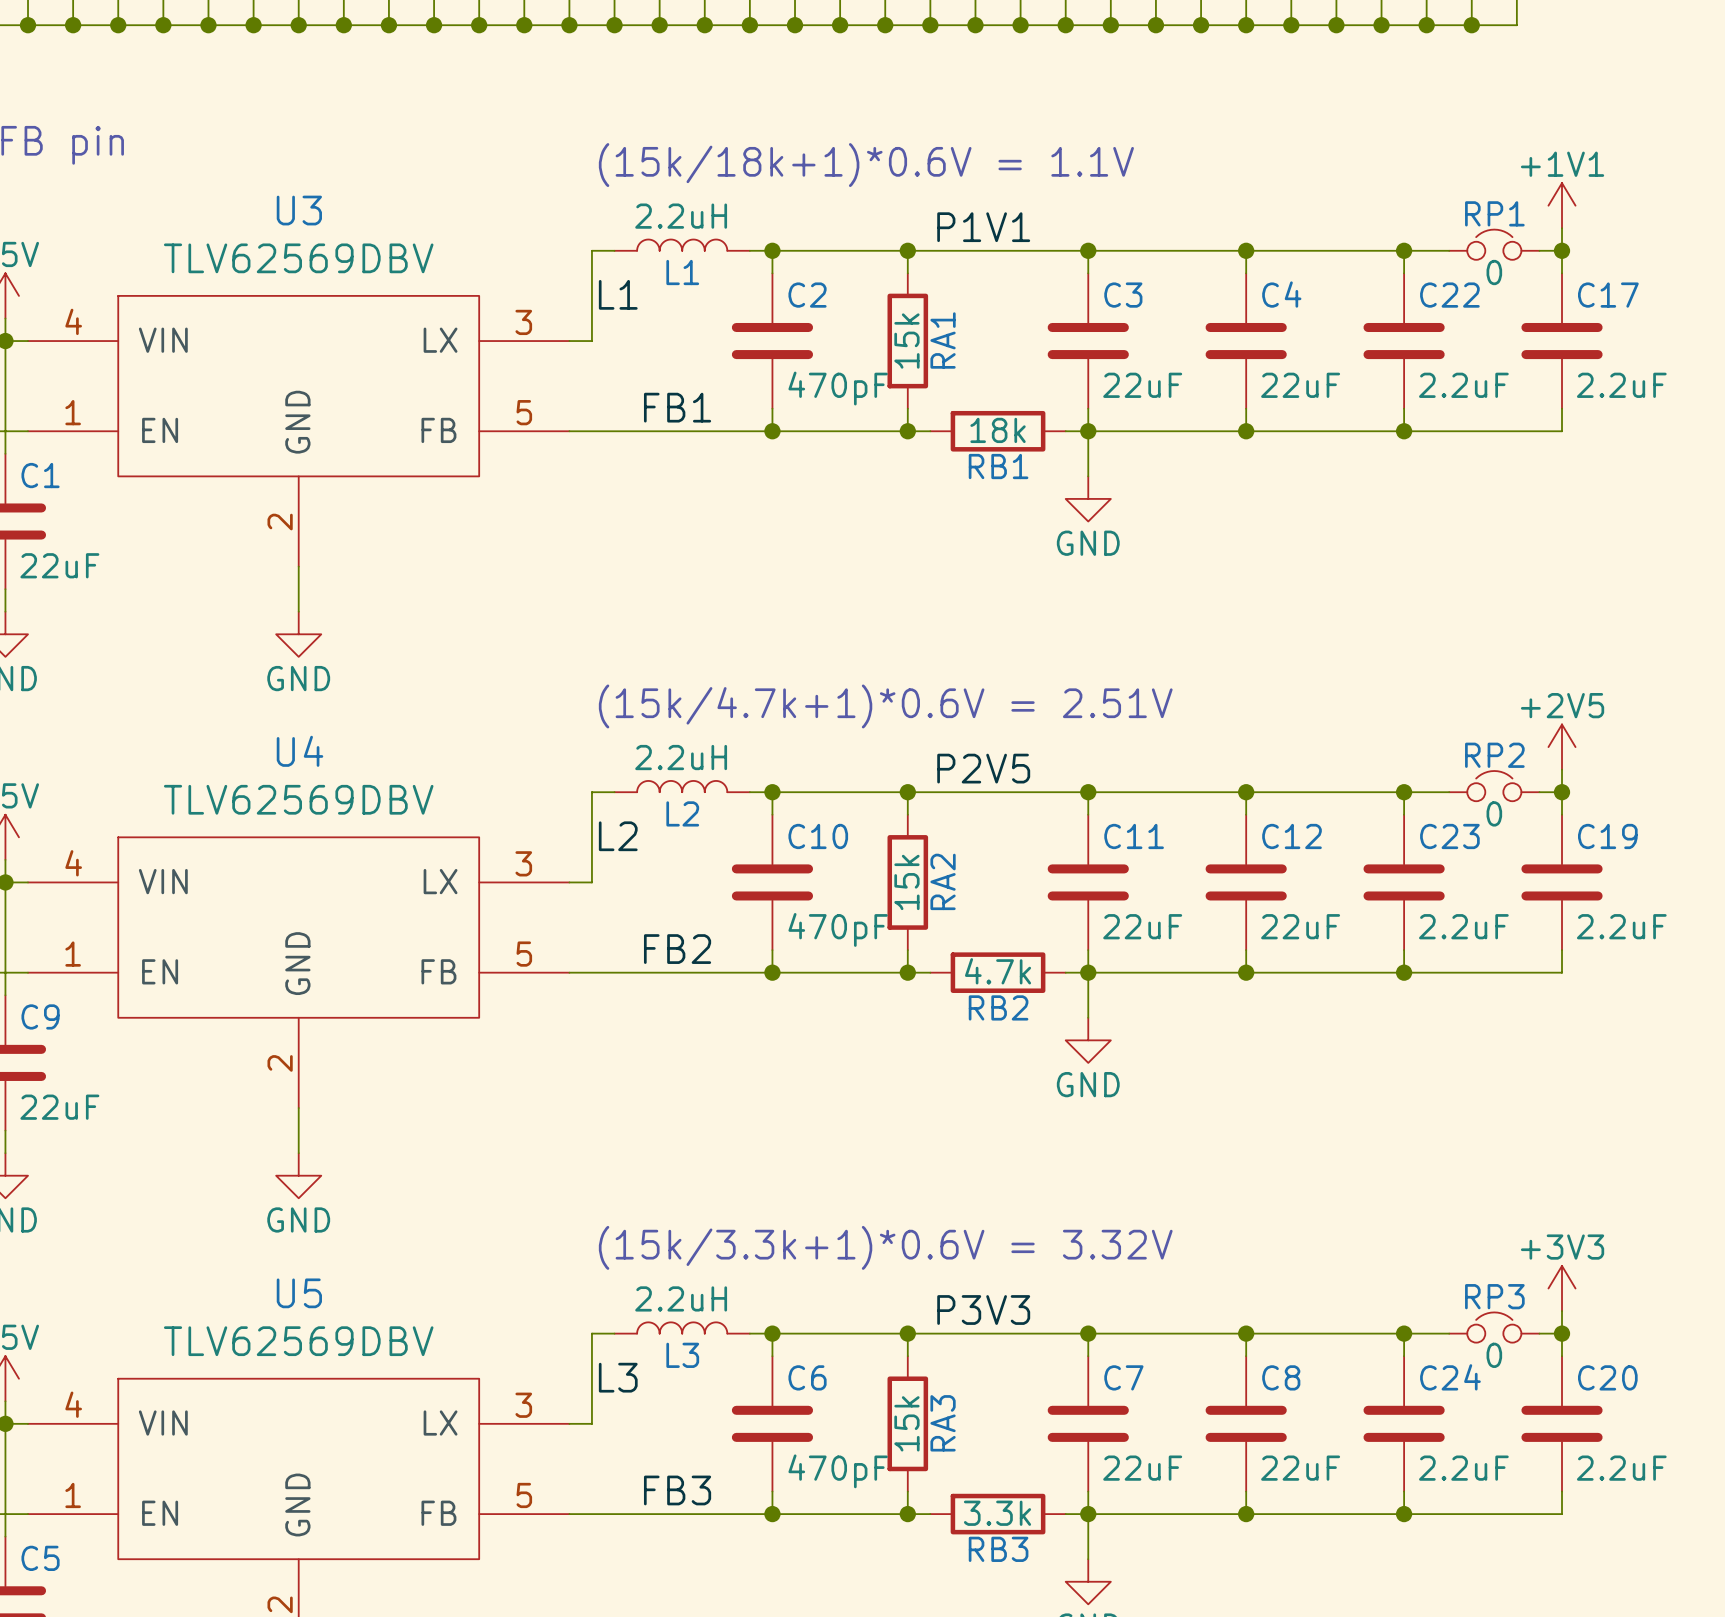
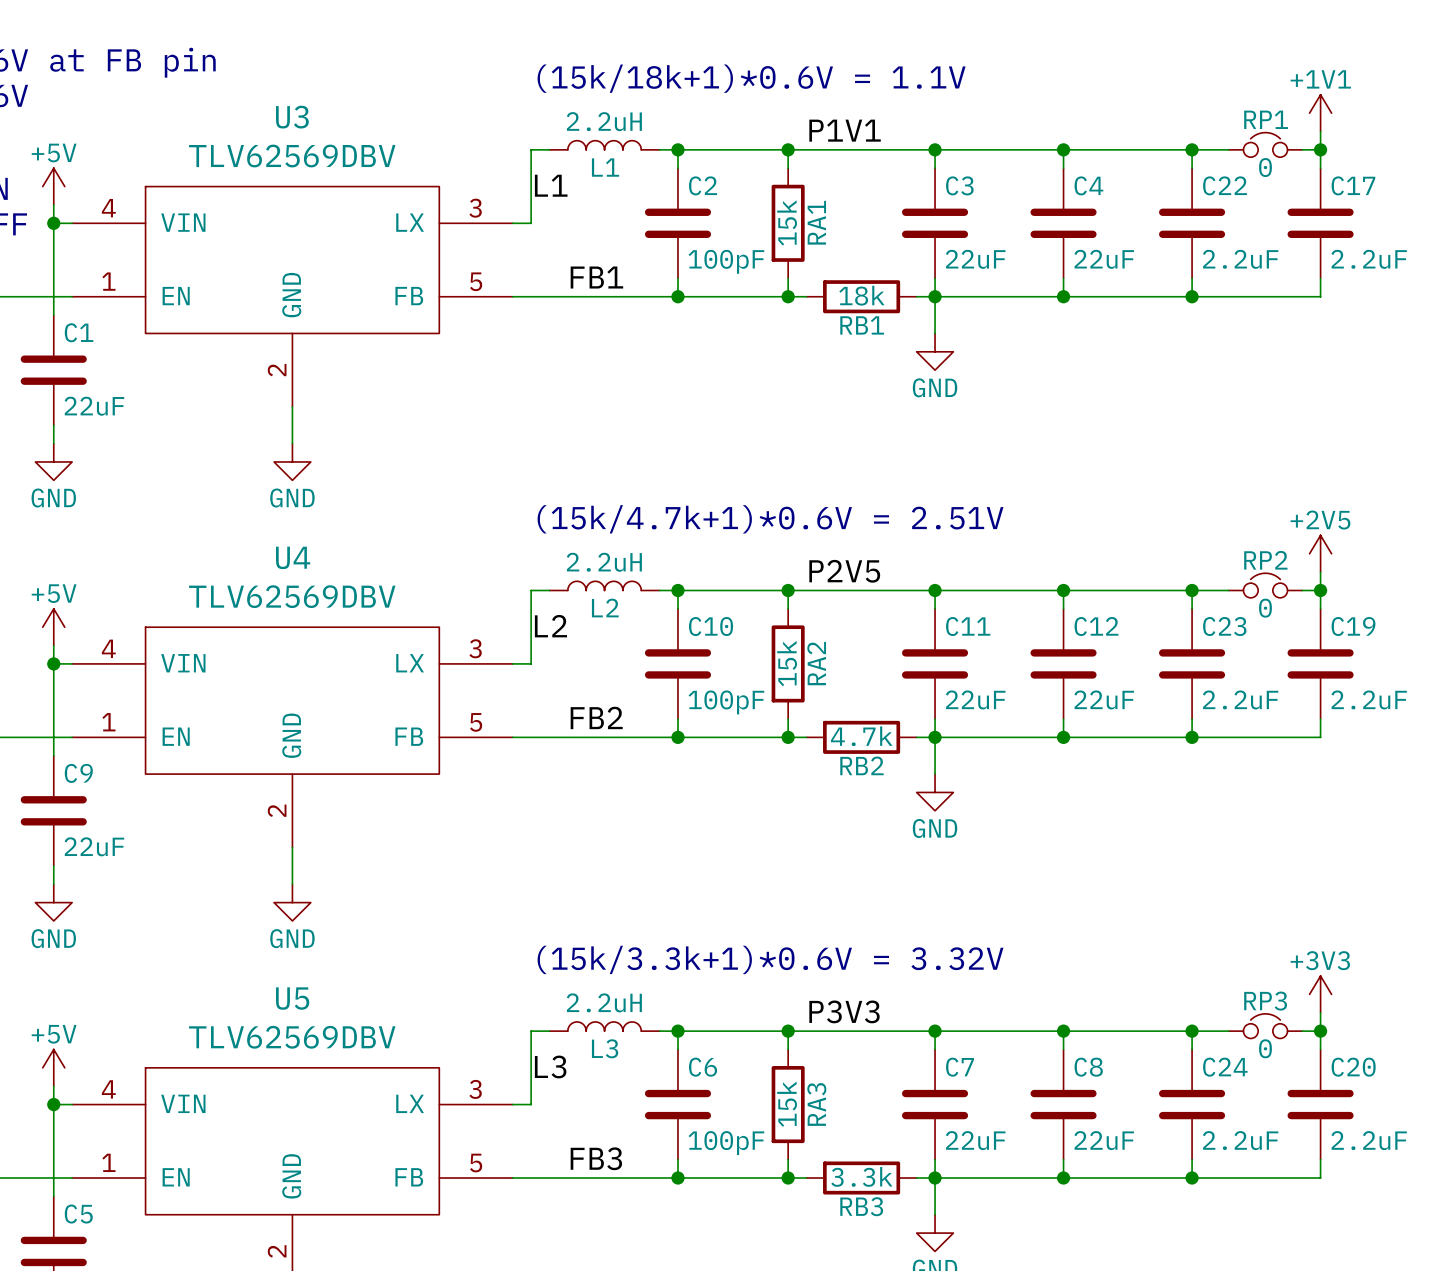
C2 value: 470pF (838, 388) -> 100pF (726, 261)
C10 value: 470pF (838, 929) -> 100pF (726, 702)
C6 value: 470pF (838, 1471) -> 100pF (726, 1143)

